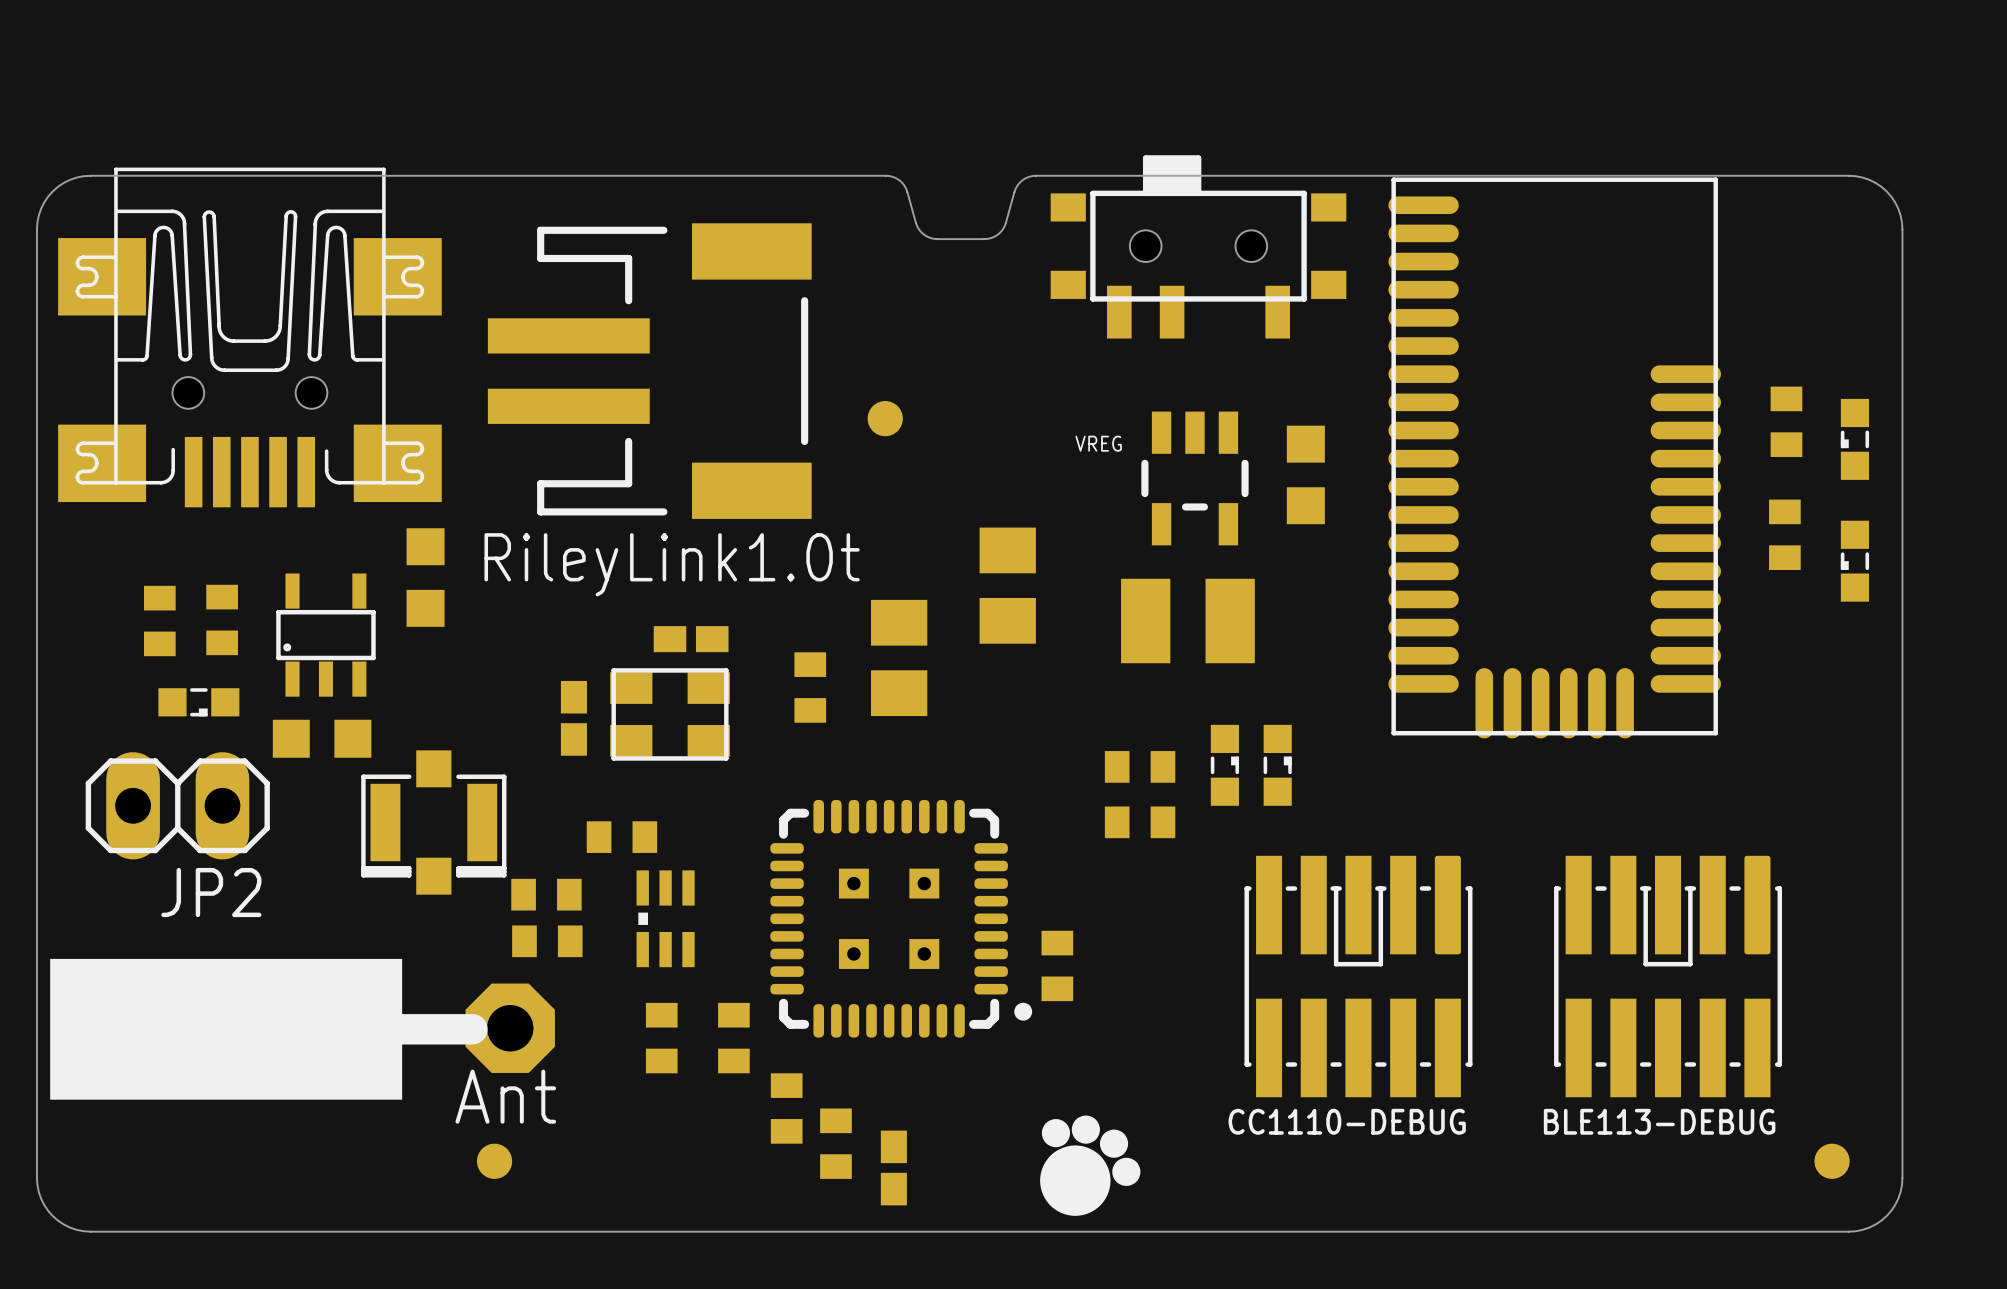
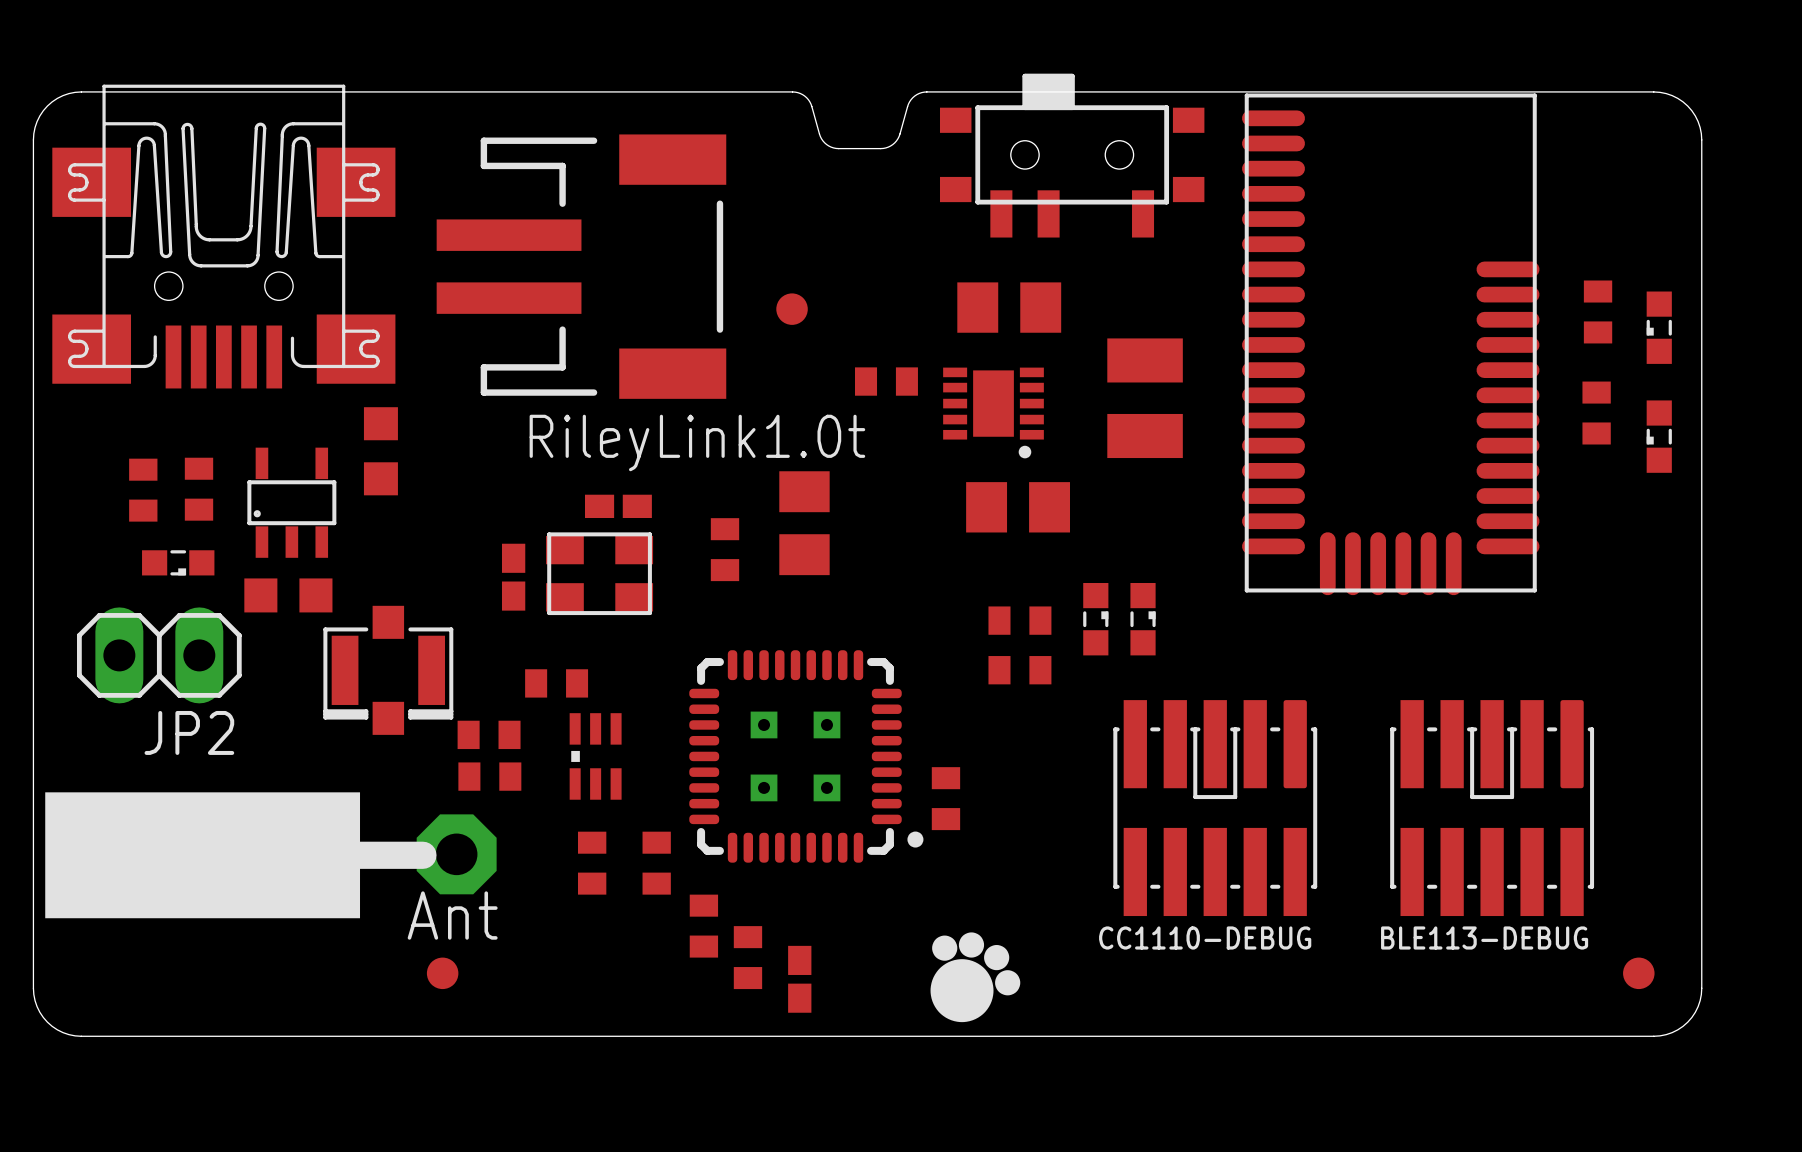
part: none -> (1009, 307)
part: (1305, 474) -> none
VREG: (1194, 478) -> none
part: none -> (886, 381)
part: none -> (993, 412)
text position: RileyLink1.0t (672, 564) -> RileyLink1.0t (697, 442)
part: (1007, 585) -> none
part rotation: 0° (1187, 621) -> 90° clockwise (1145, 398)
part position: (1187, 621) -> (1145, 398)
part: none -> (1018, 507)

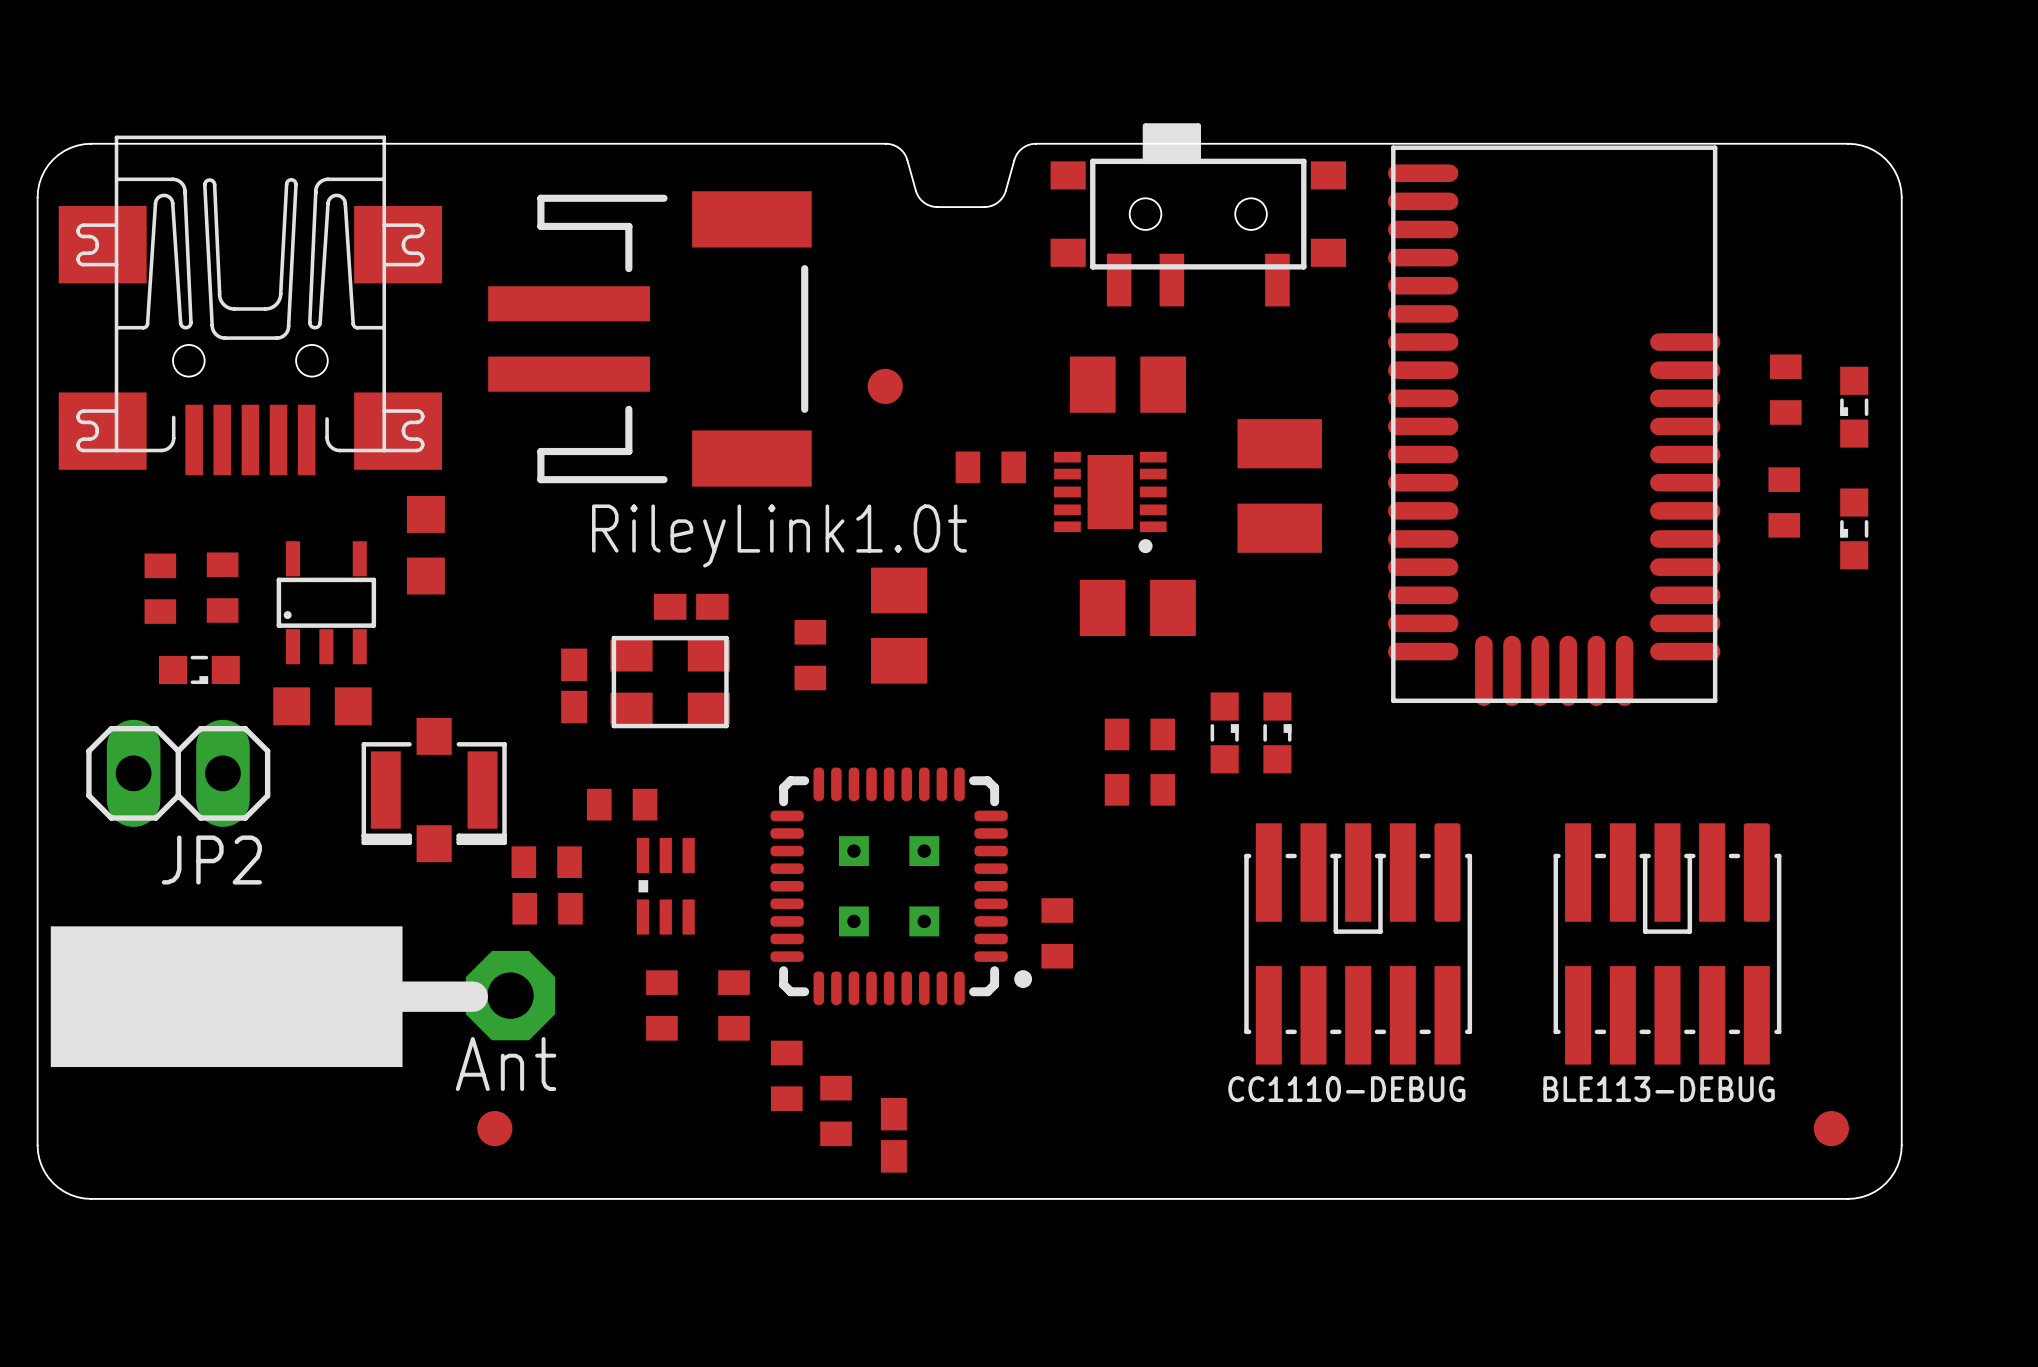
drawing: [930, 932, 1021, 1023] -> none

